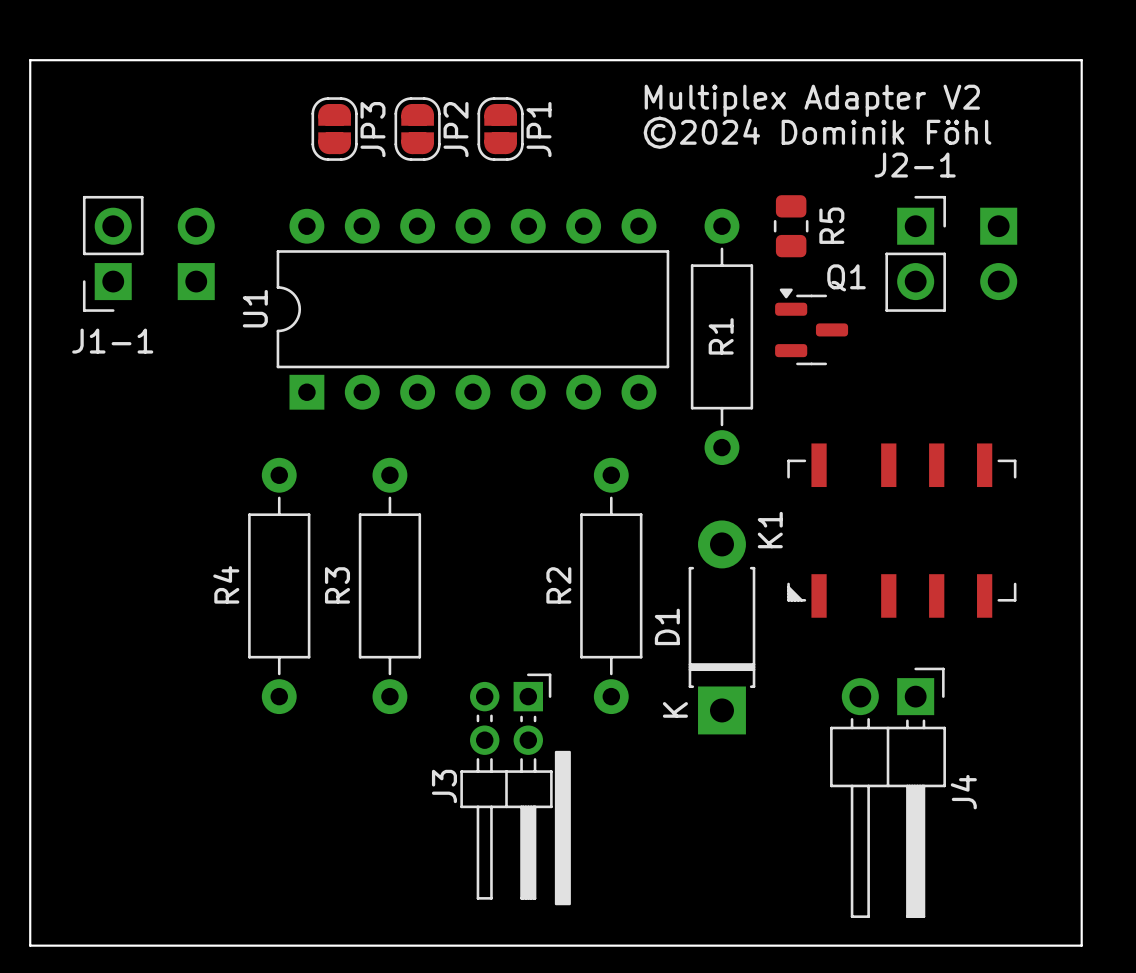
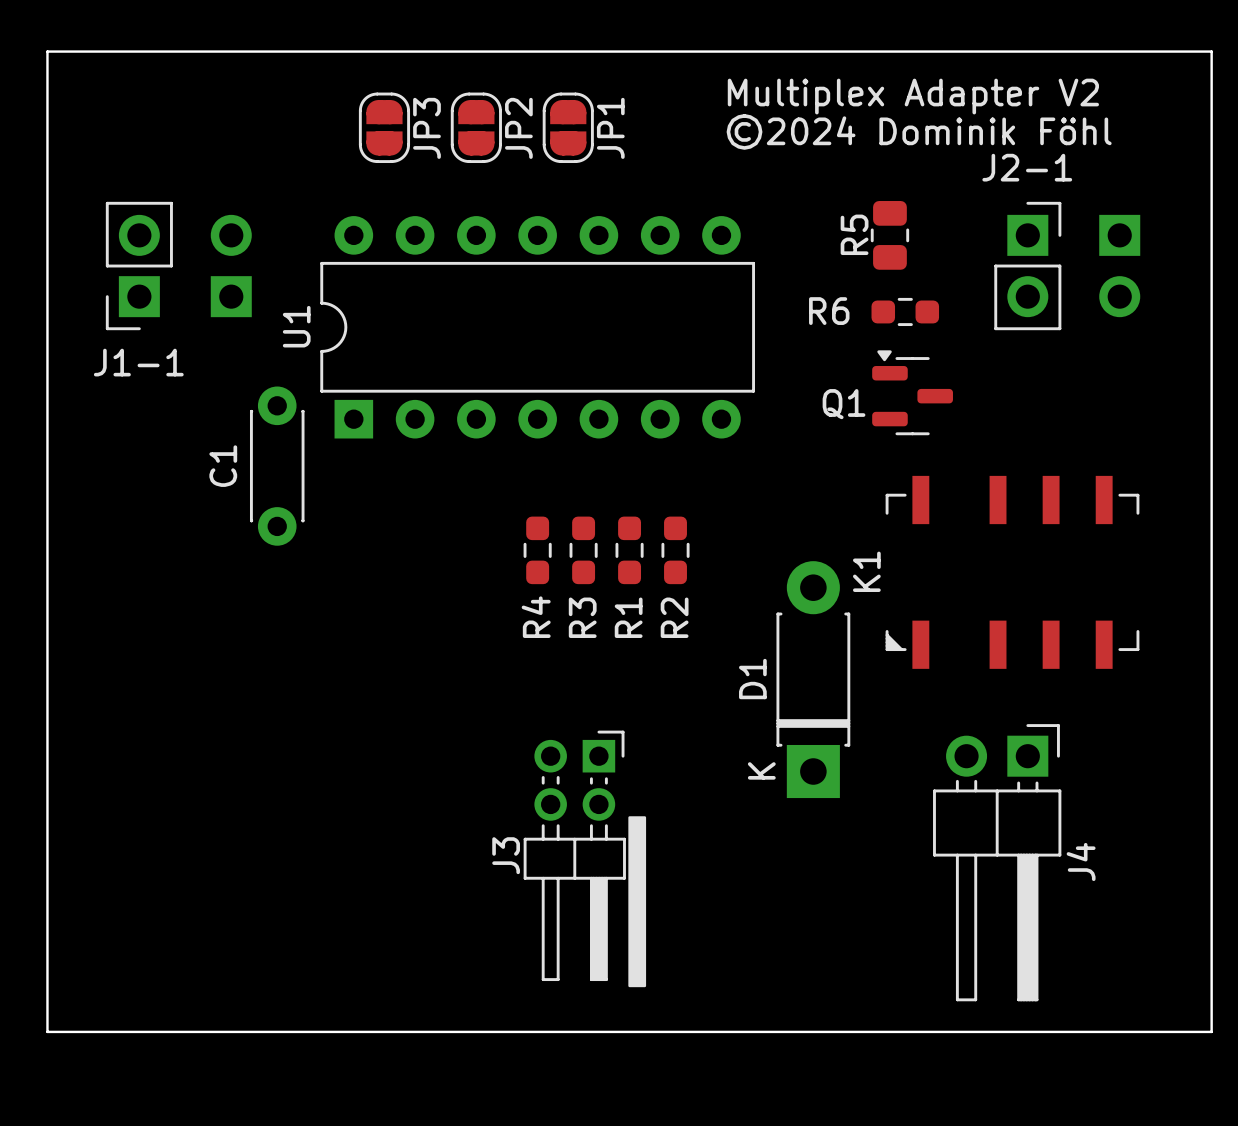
R1 footprint: [690, 208, 754, 466] -> [615, 516, 644, 585]
R5 name position: R5 (831, 225) -> R5 (854, 234)
Q1 name position: Q1 (846, 277) -> Q1 (844, 404)
R6: none -> (905, 311)
Q1 position: (811, 326) -> (912, 392)
R1 name position: R1 (721, 336) -> R1 (628, 617)
C1: none -> (277, 466)
R4 footprint: [248, 457, 311, 715] -> [523, 516, 552, 585]
R3 footprint: [358, 457, 422, 715] -> [569, 516, 598, 585]
R2 footprint: [580, 457, 643, 715] -> [661, 516, 690, 585]
R4 name position: R4 (226, 584) -> R4 (536, 617)
R3 name position: R3 (337, 585) -> R3 (582, 617)
R2 name position: R2 (558, 585) -> R2 (674, 617)

